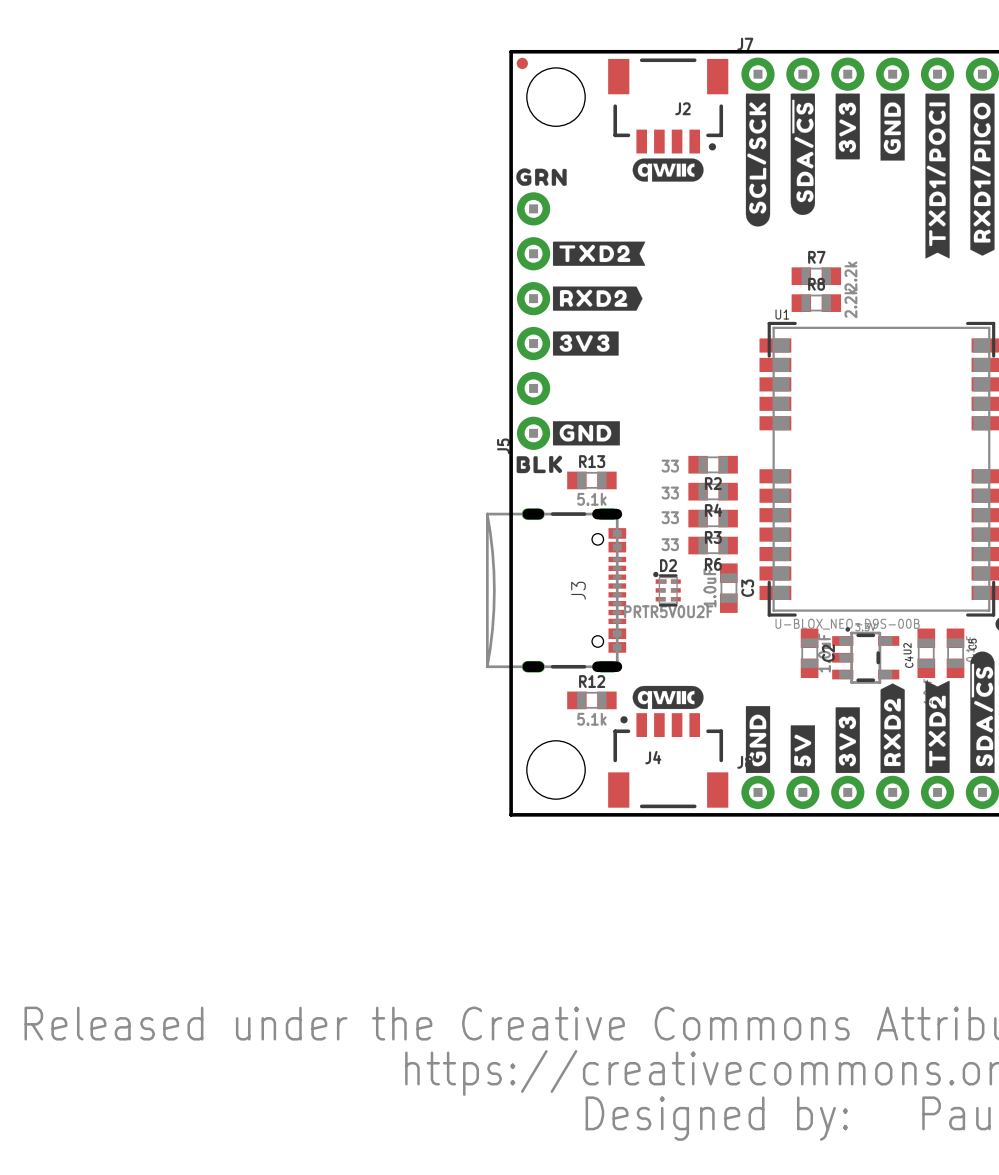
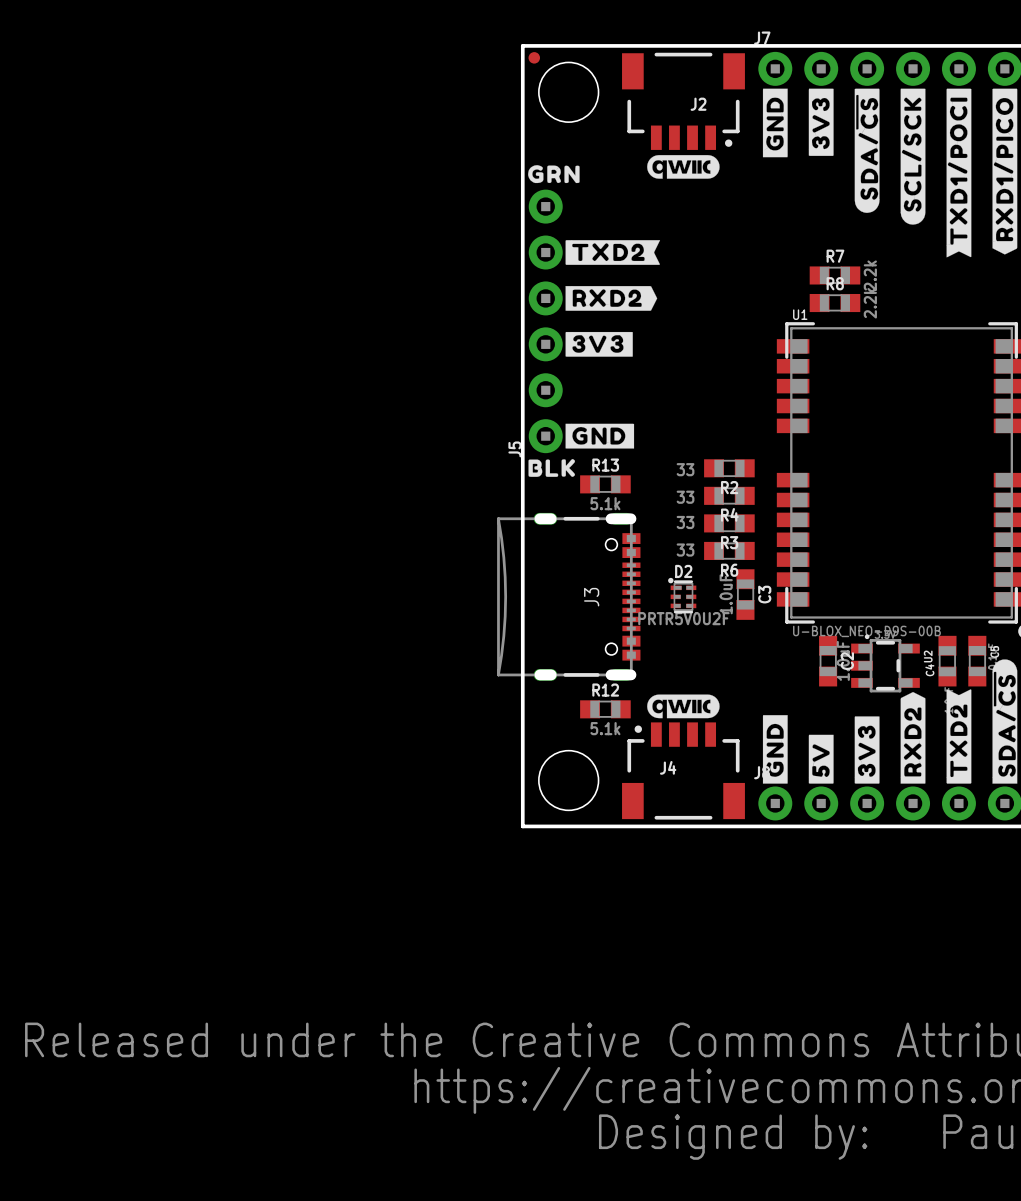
drawing position: (847, 126) -> (821, 122)
drawing position: (892, 127) -> (775, 122)
drawing position: (802, 154) -> (867, 150)
drawing position: (758, 160) -> (913, 156)

